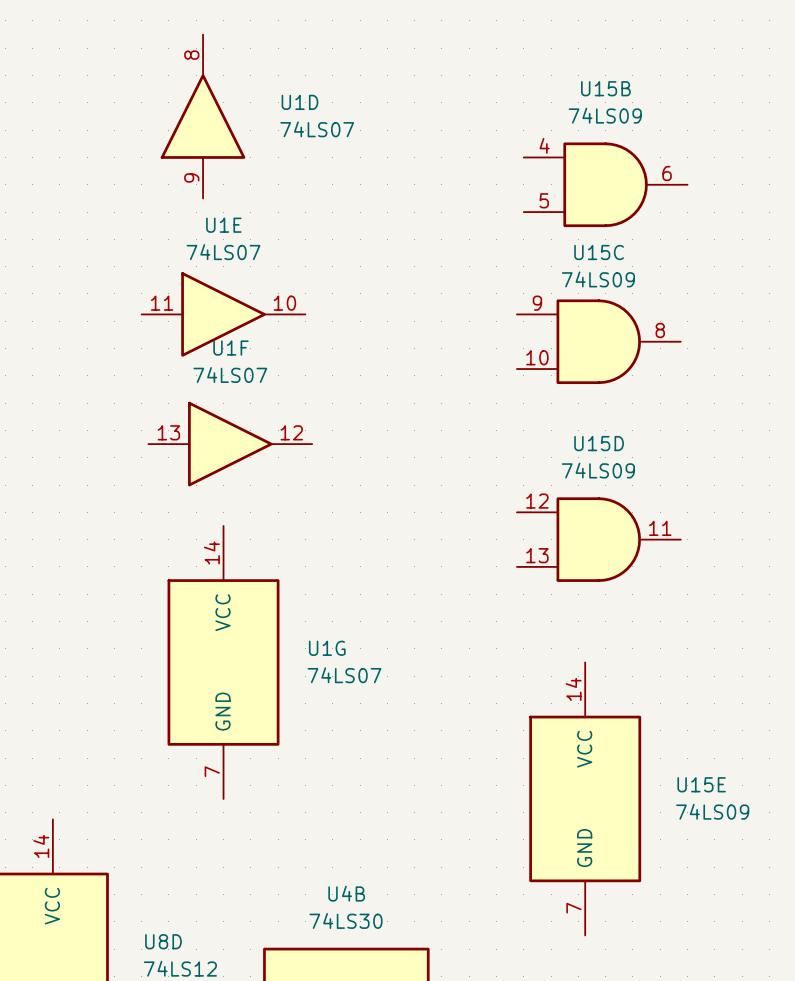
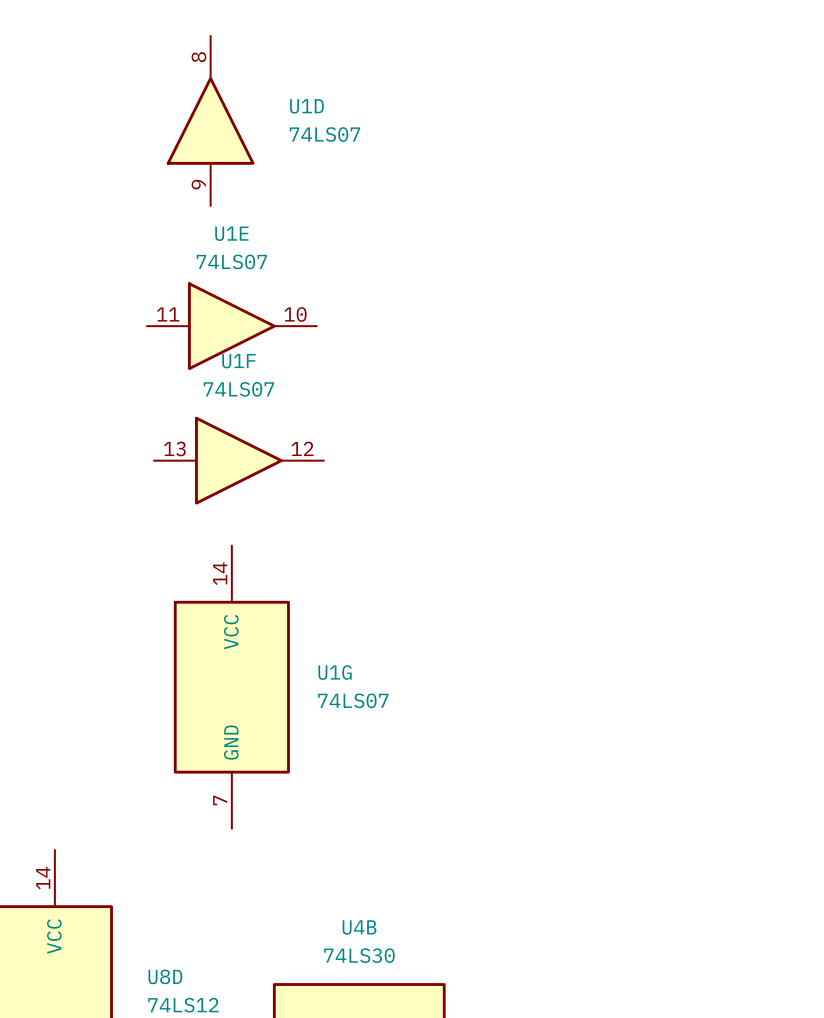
U15B: 74LS09 (605, 184) -> none
U15C: 74LS09 (598, 341) -> none
U15D: 74LS09 (598, 539) -> none
U15E: 74LS09 (585, 798) -> none

